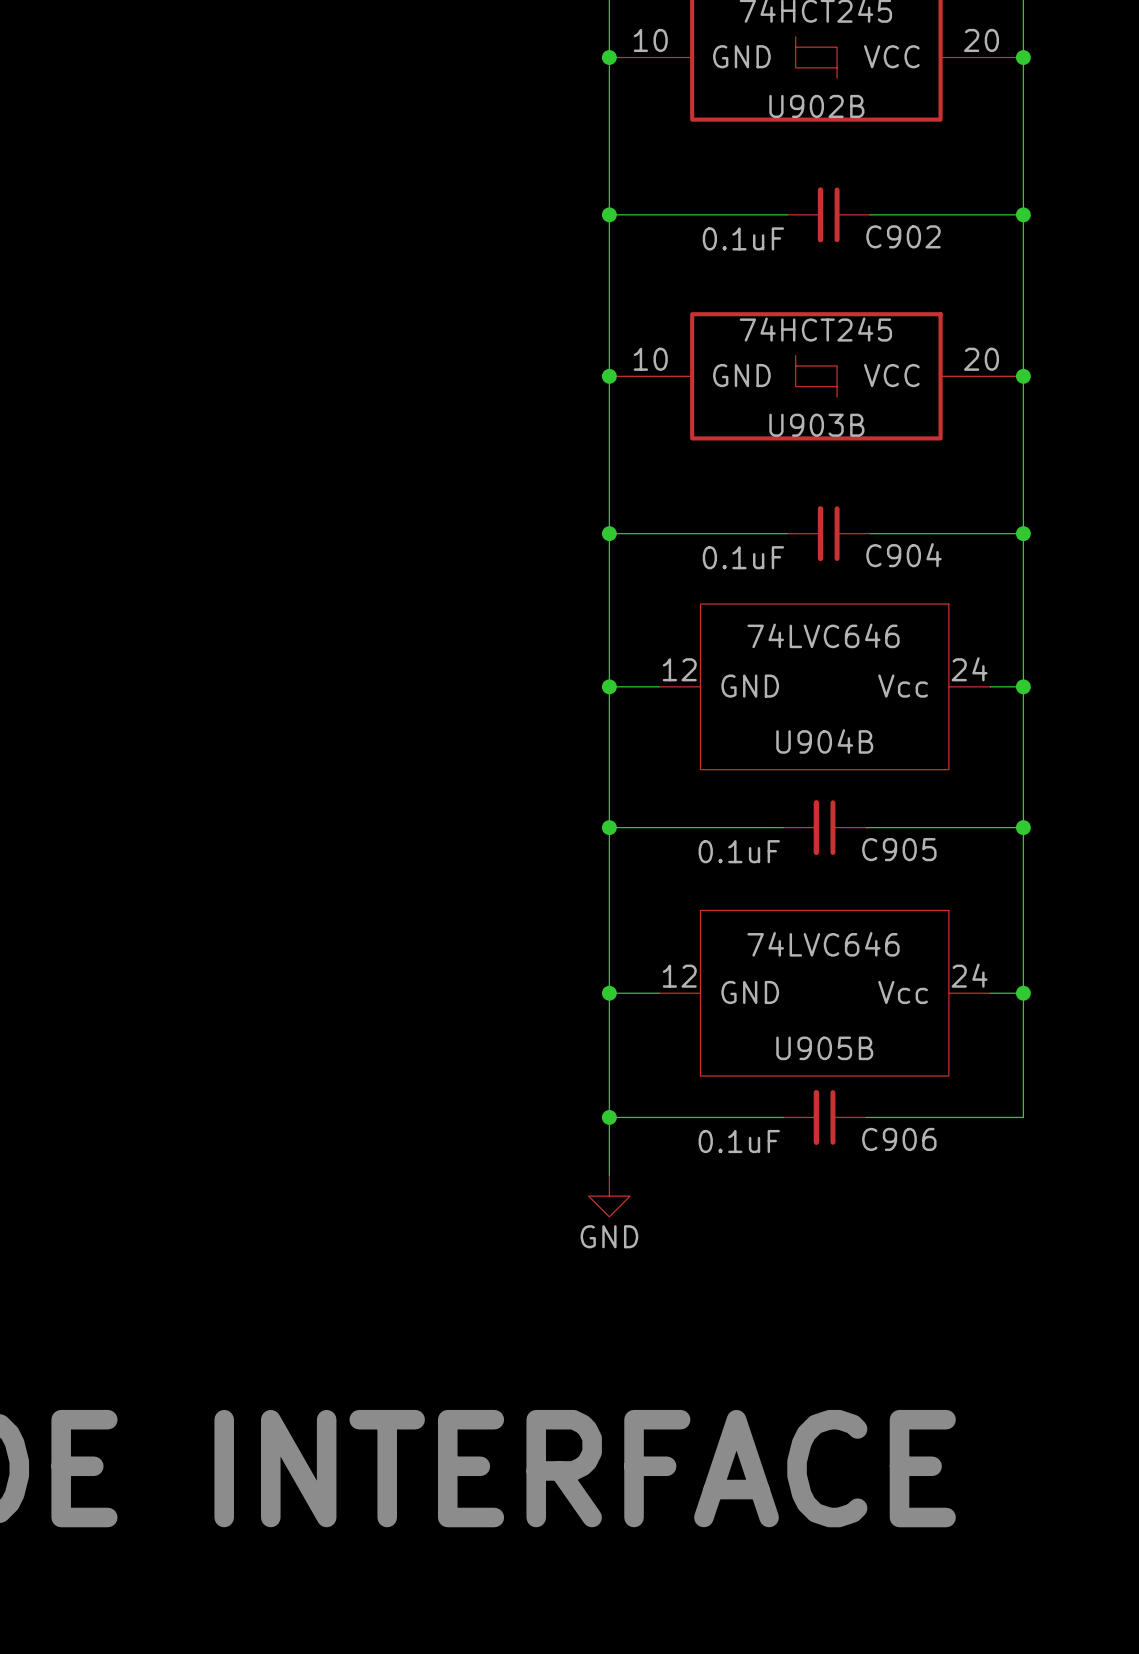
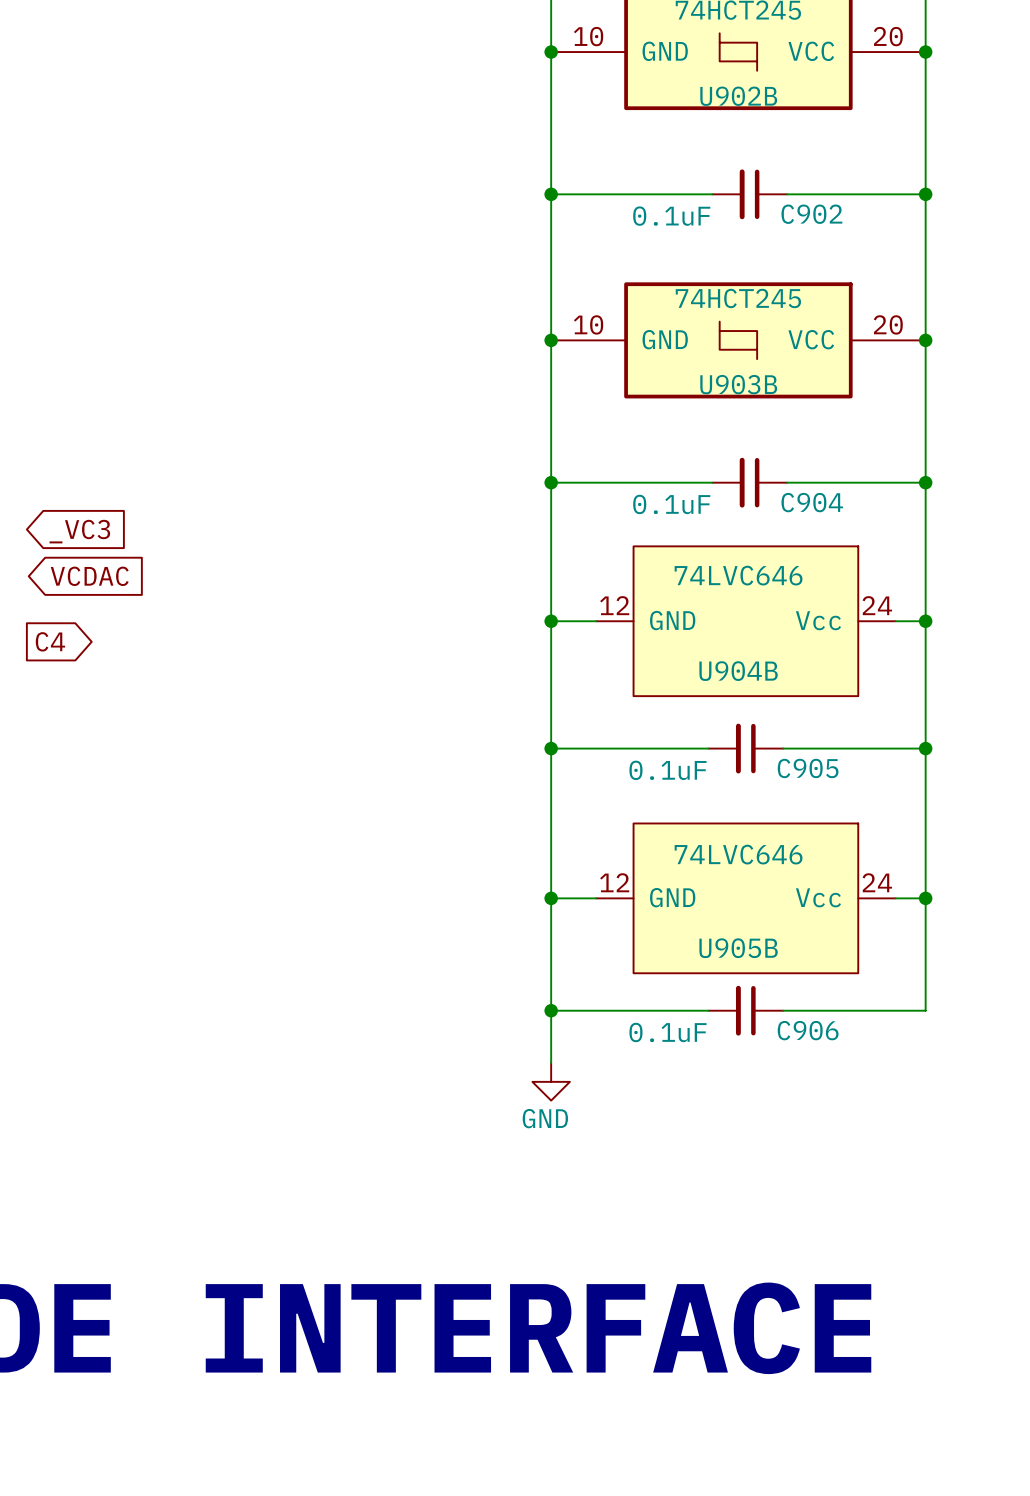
global label: none -> _VC3 (79, 531)
global label: none -> VCDAC (89, 576)
global label: none -> C4 (50, 641)

